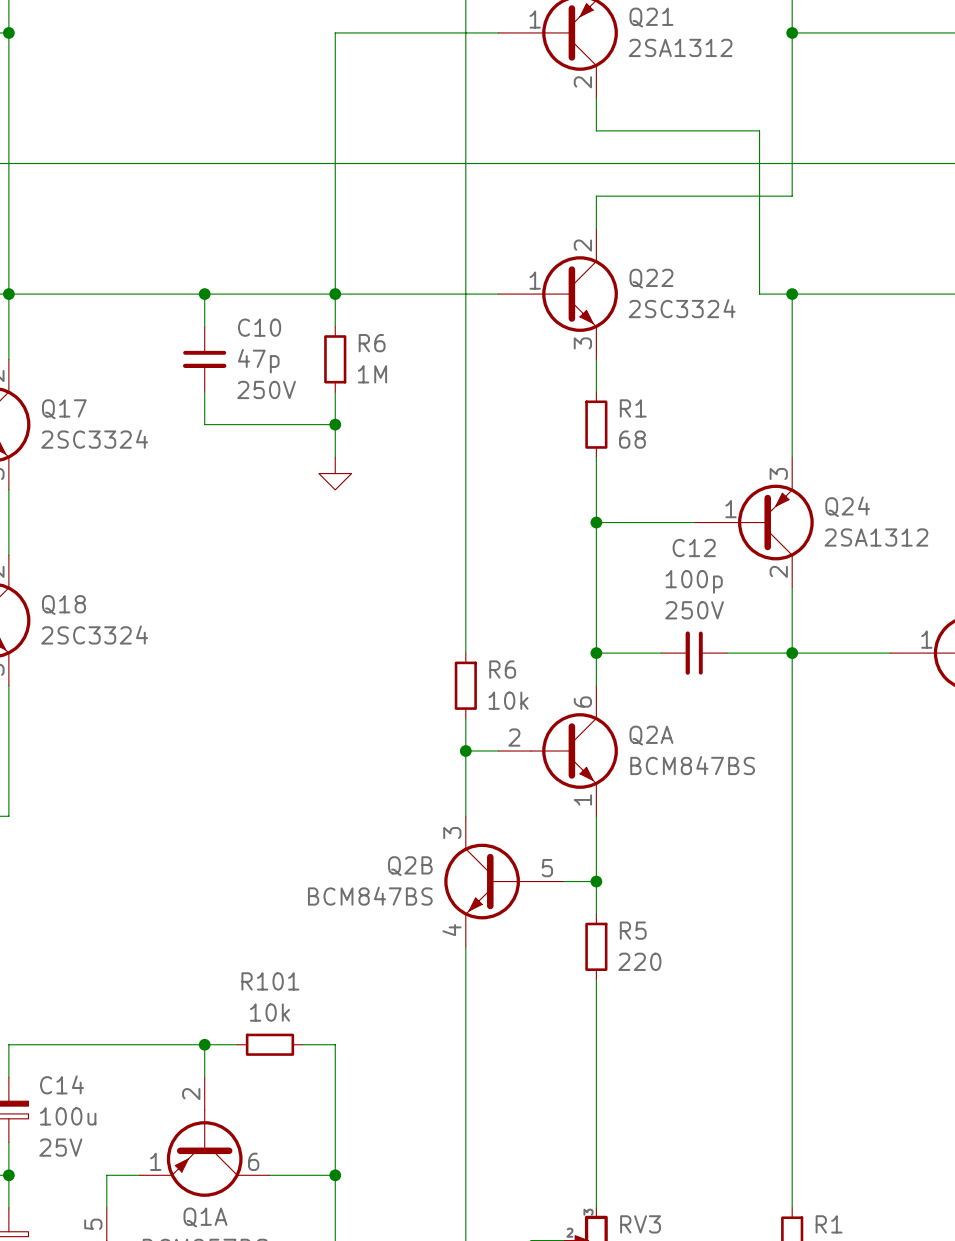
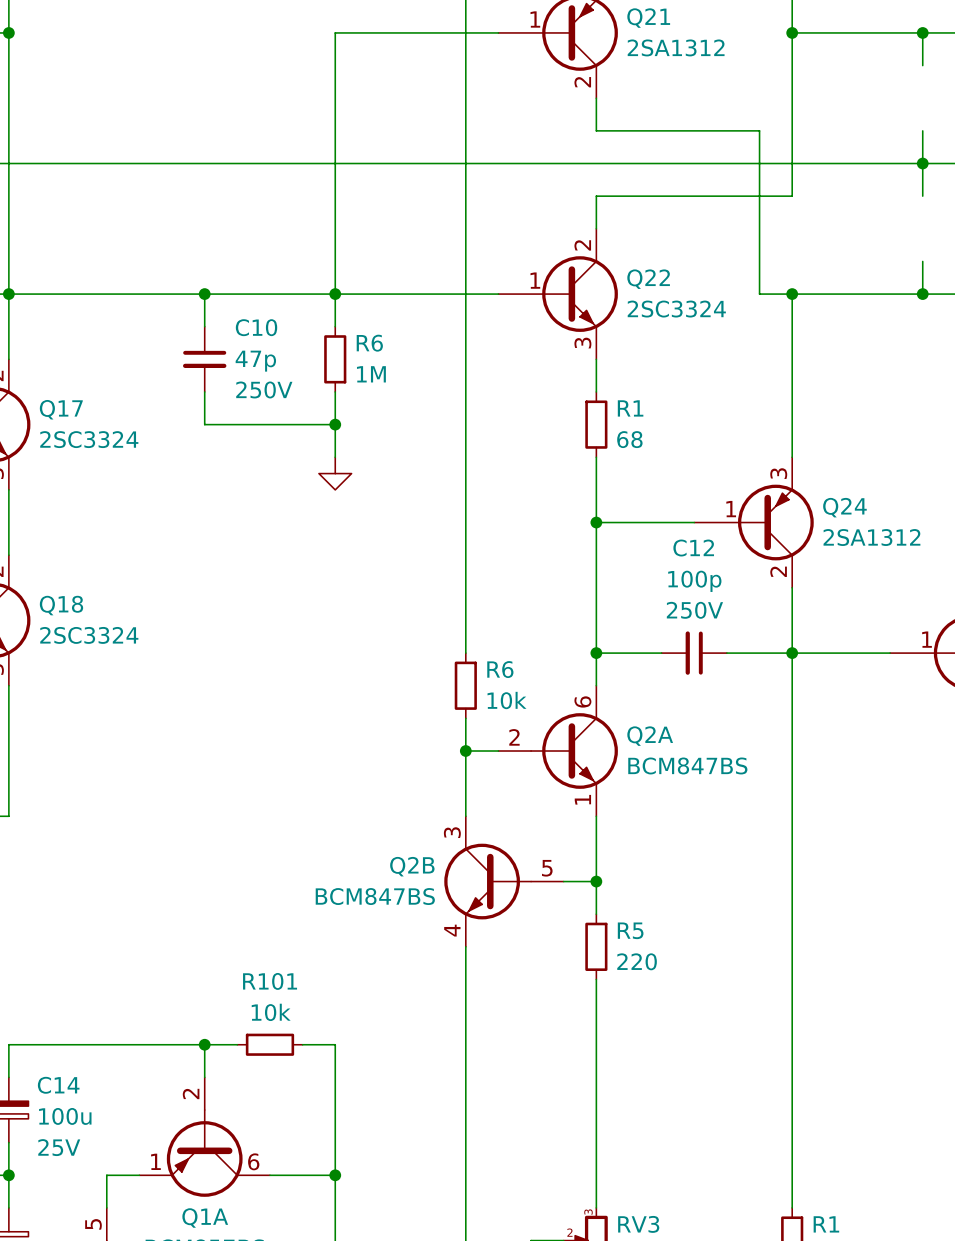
wire: none -> (922, 32) (922, 65)
junction: none -> (922, 32)
wire: none -> (922, 130) (922, 196)
junction: none -> (922, 163)
wire: none -> (922, 261) (922, 294)
junction: none -> (922, 294)

